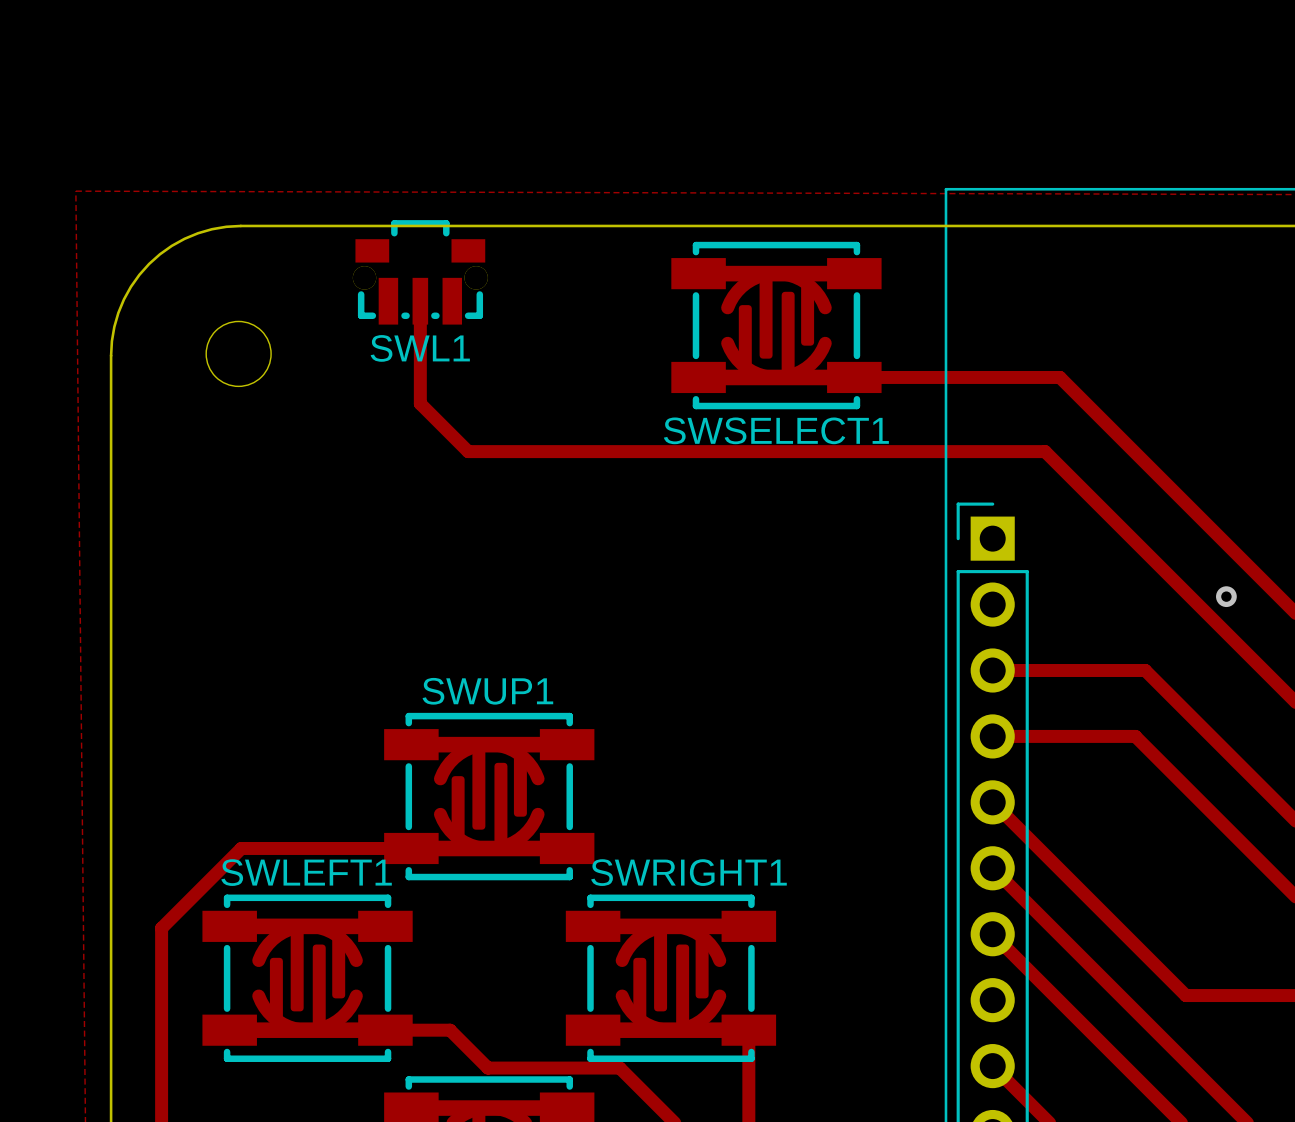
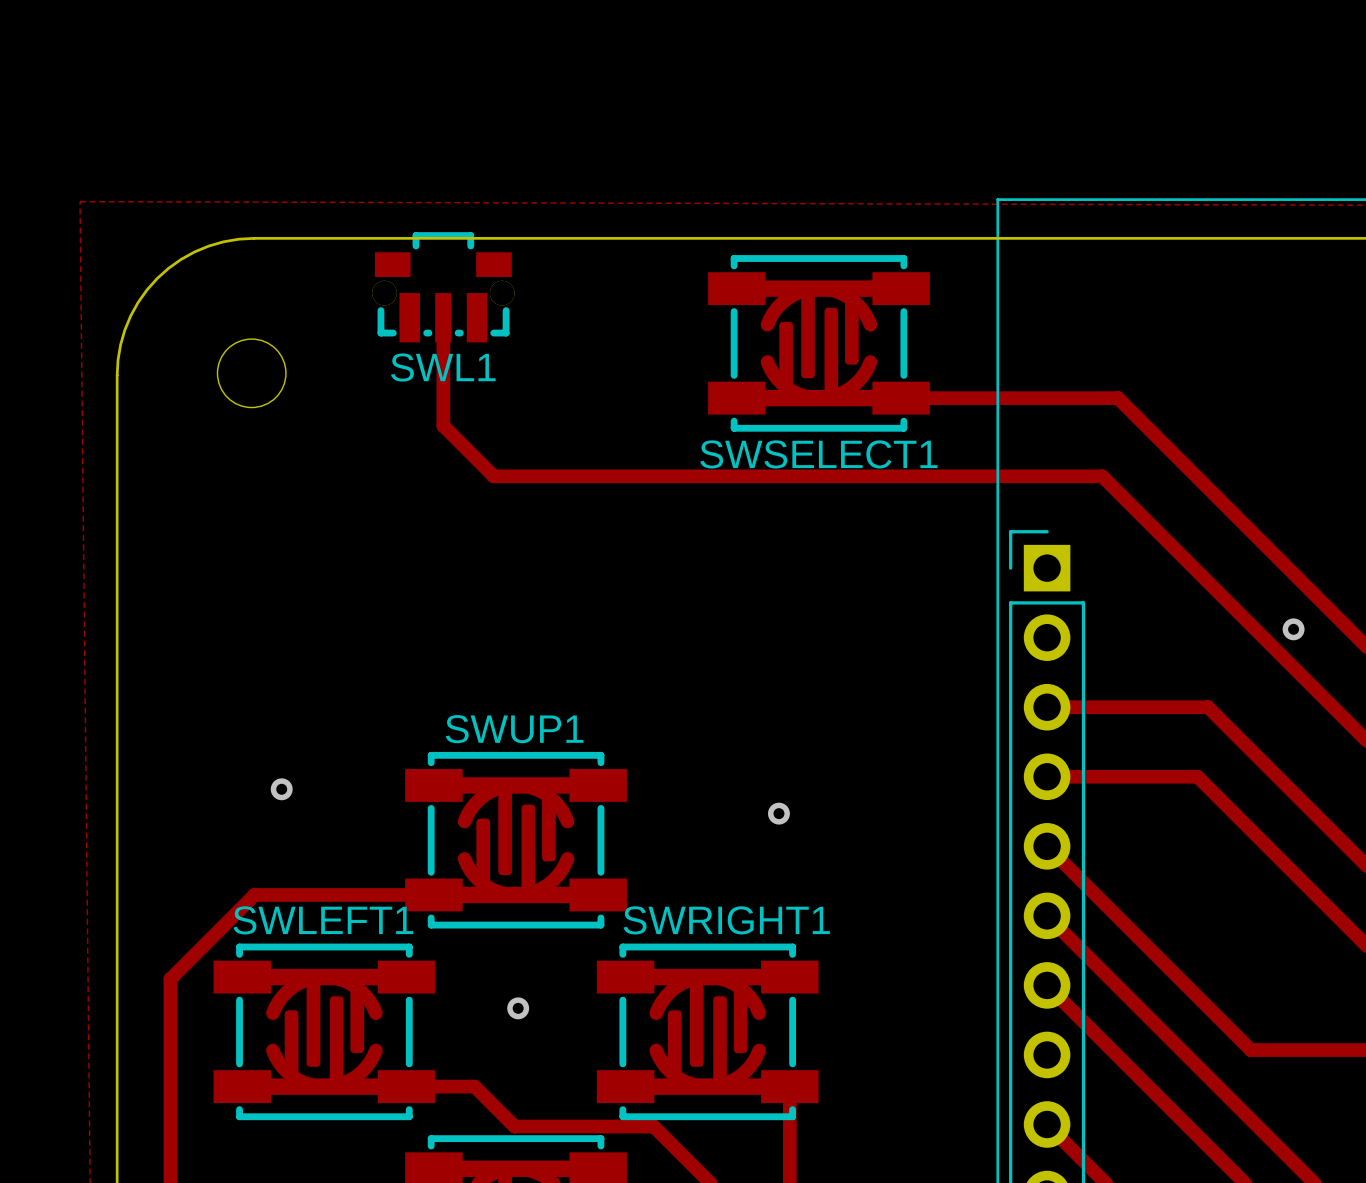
via: none -> (281, 789)
via: none -> (778, 813)
via: none -> (518, 1008)

